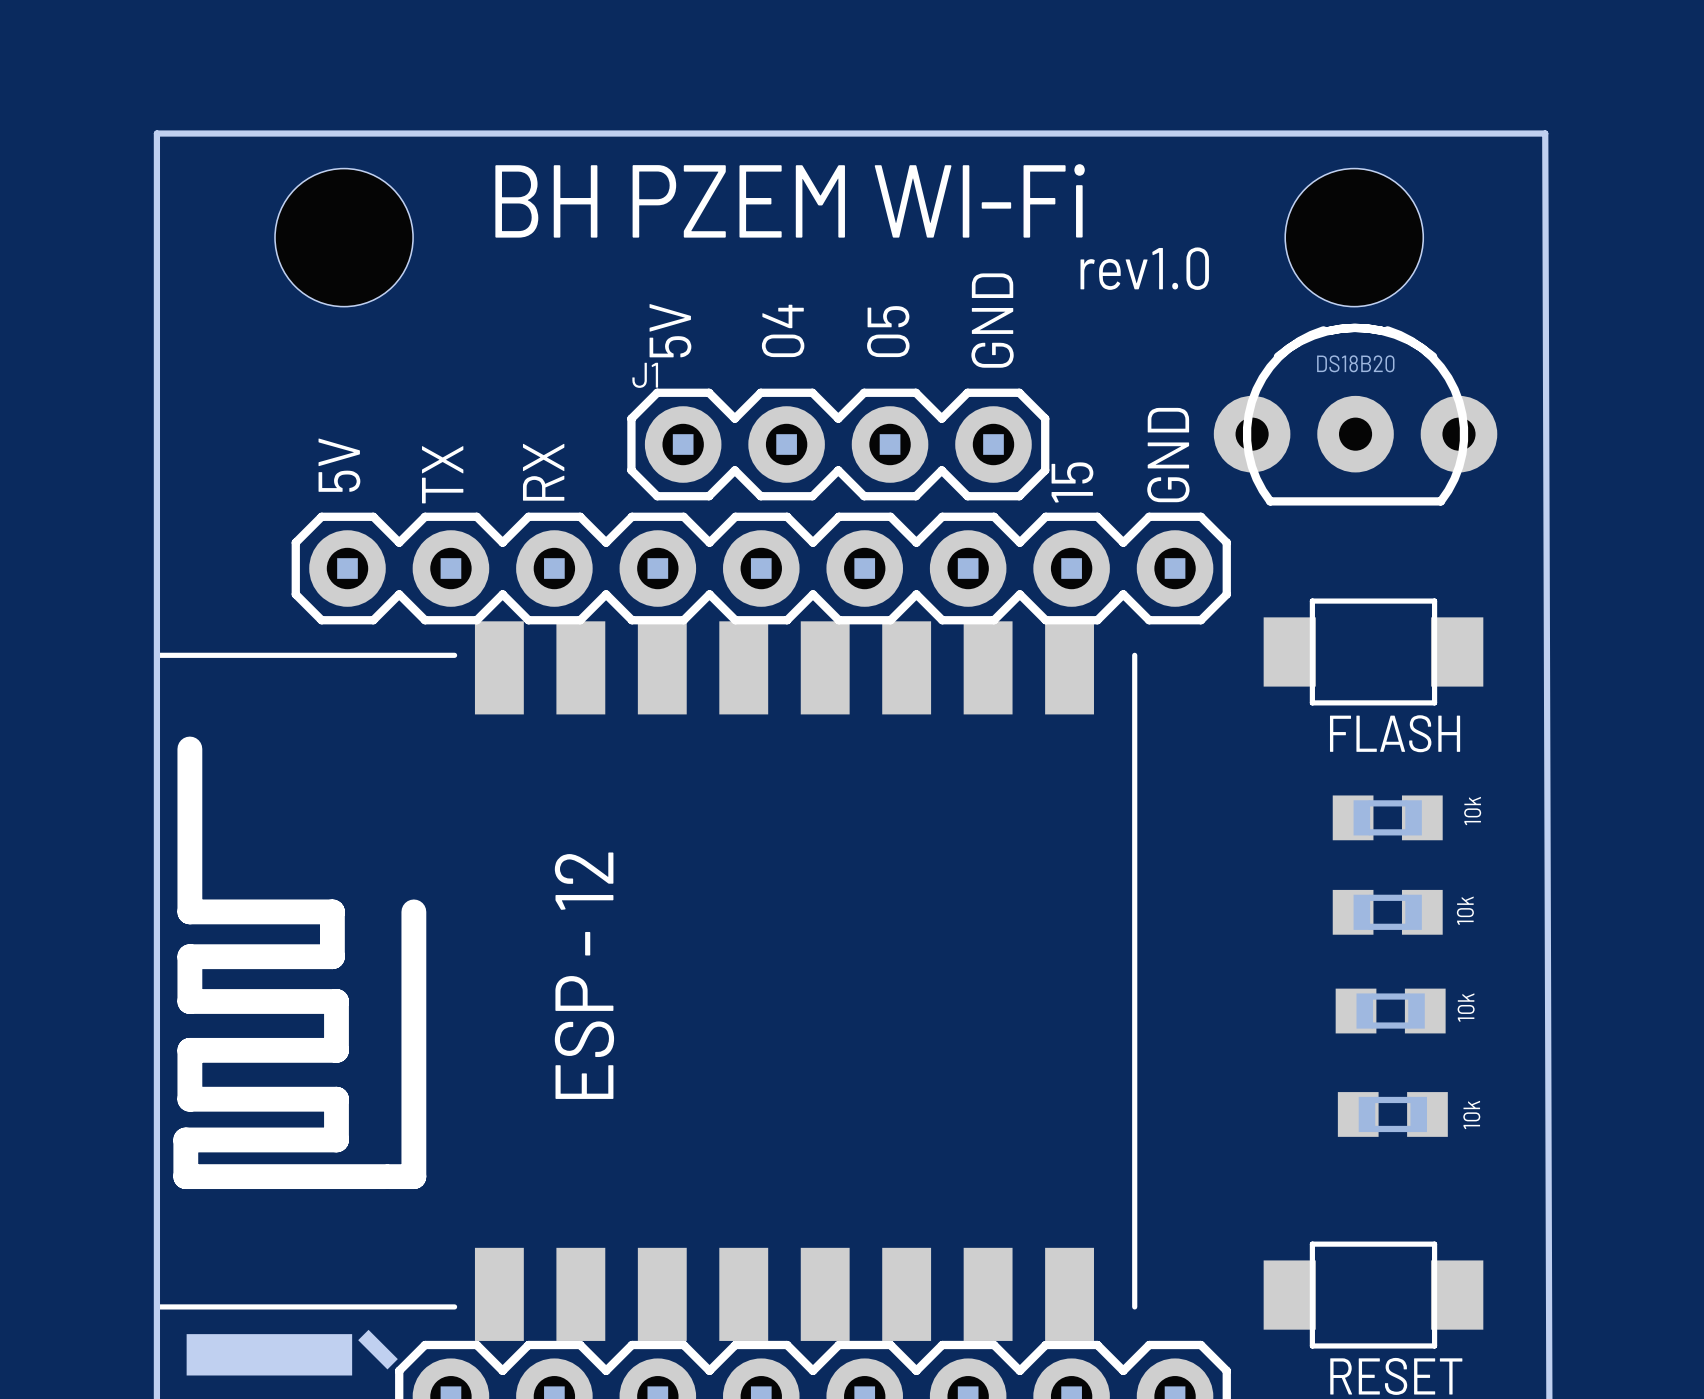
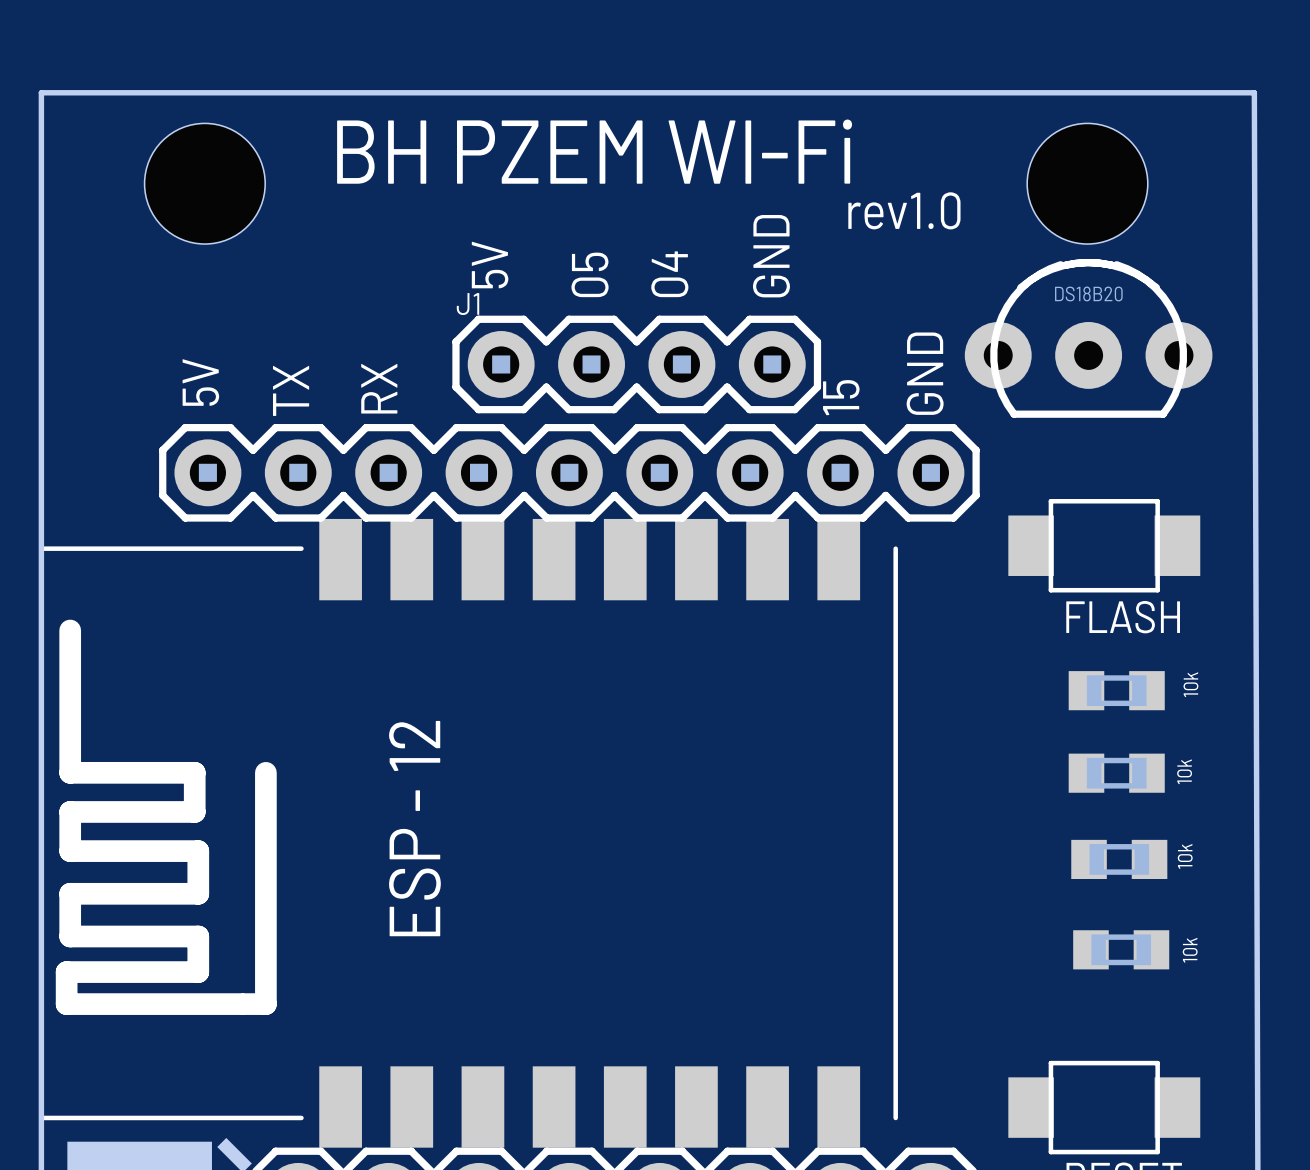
text: 04 (783, 330) -> 05 (590, 274)
text: 05 (888, 331) -> 04 (669, 274)

